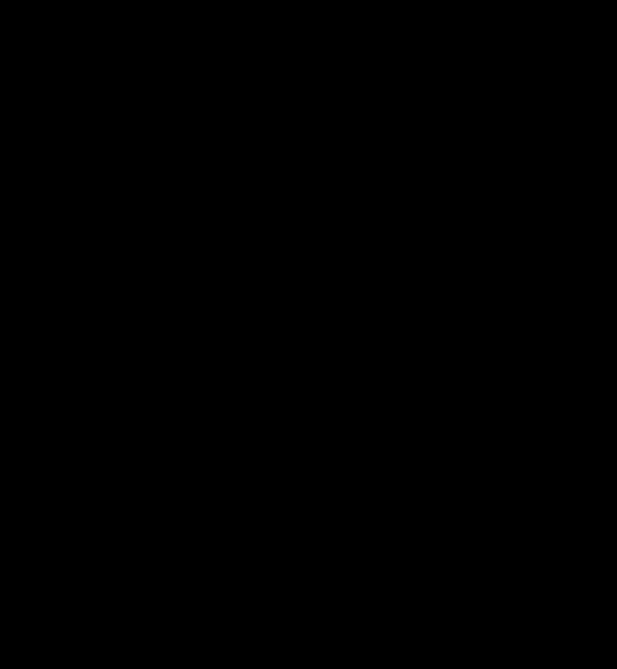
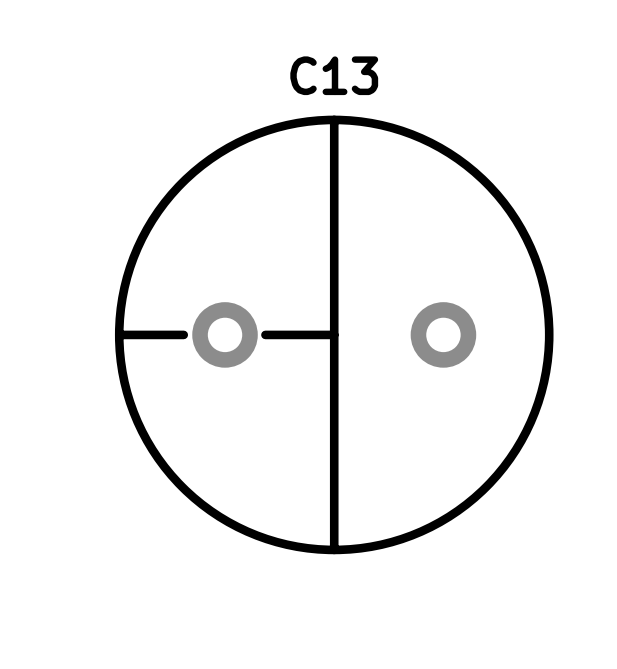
C13: none -> (334, 334)

